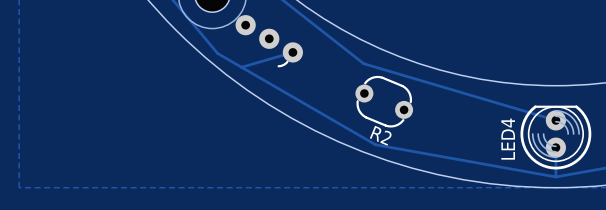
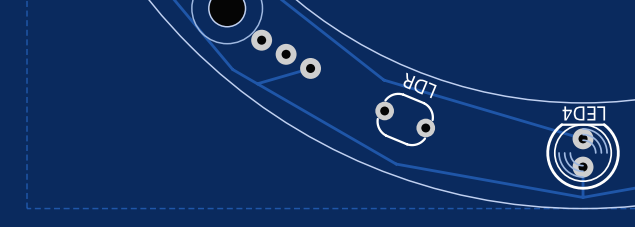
part footprint: [235, 15, 303, 68] -> [251, 29, 322, 79]
R2 name: R2 (380, 135) -> LDR (419, 85)
LED4 name rotation: 0° (508, 139) -> 90° counterclockwise (583, 113)
LED4 name position: LED4 (508, 139) -> LED4 (583, 113)

